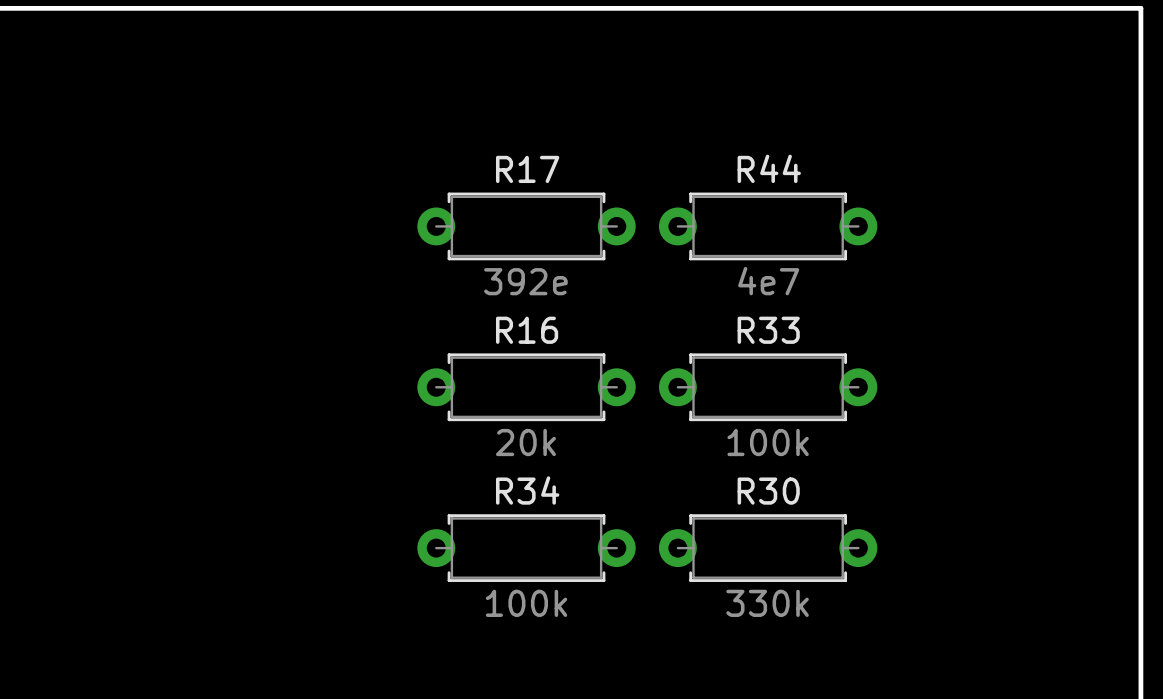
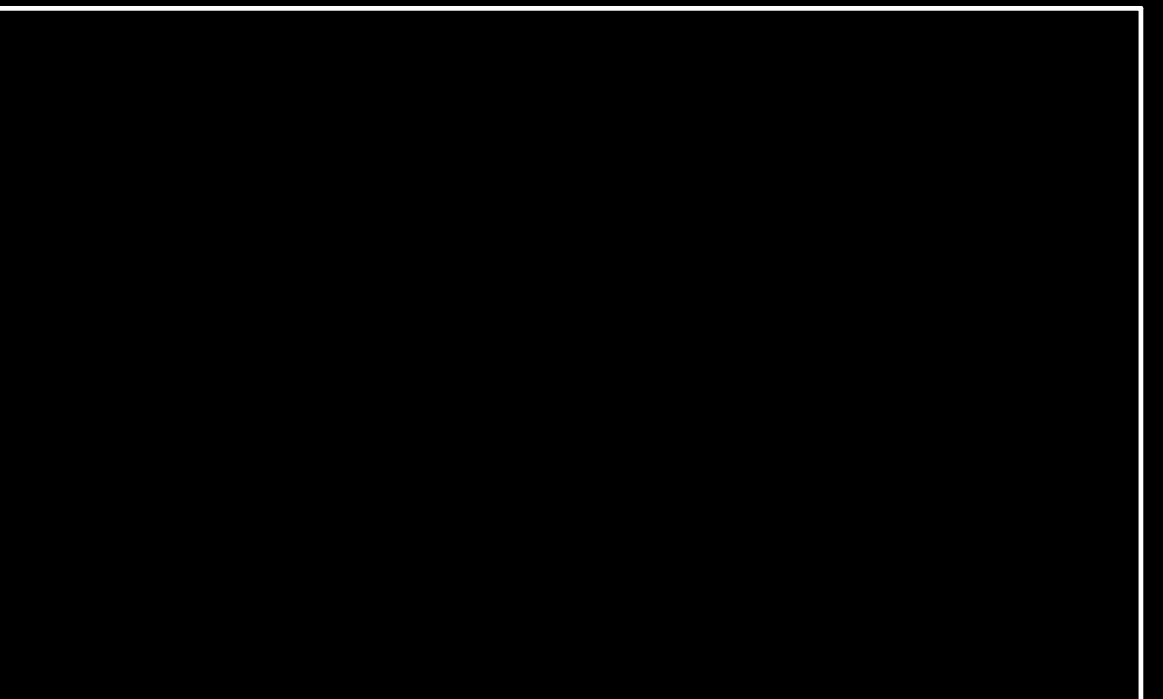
R17: 392e (526, 226) -> none
R44: 4e7 (768, 226) -> none
R16: 20k (526, 387) -> none
R33: 100k (768, 387) -> none
R34: 100k (526, 548) -> none
R30: 330k (768, 548) -> none

